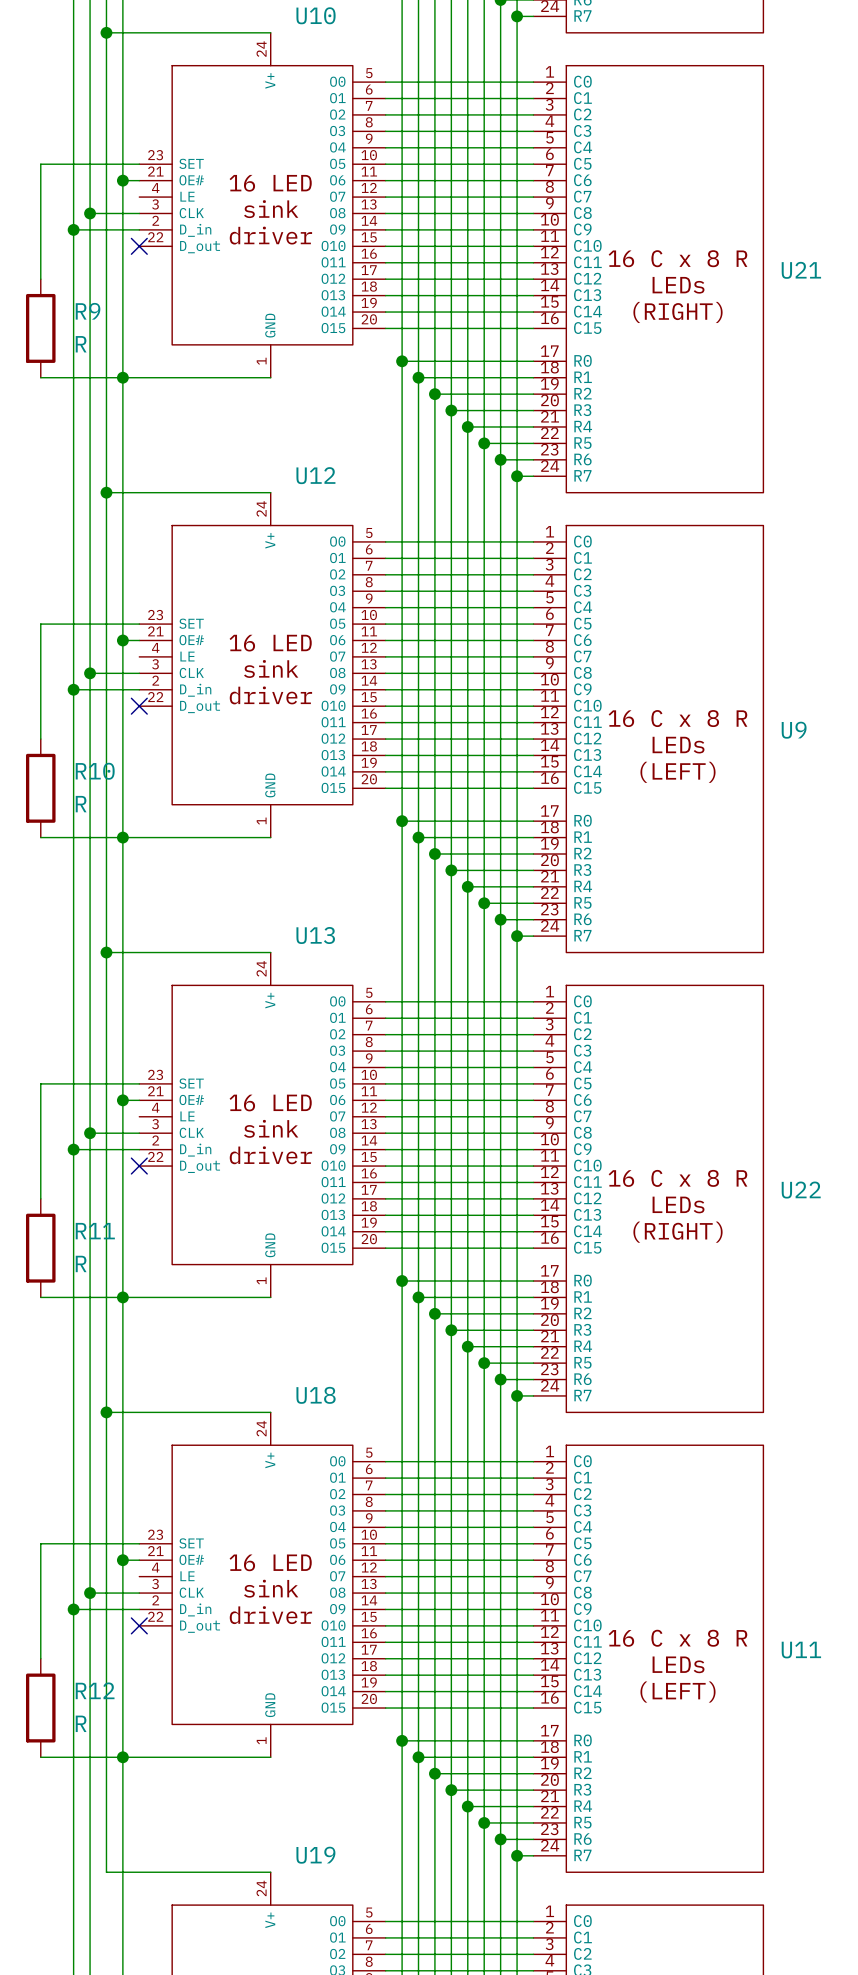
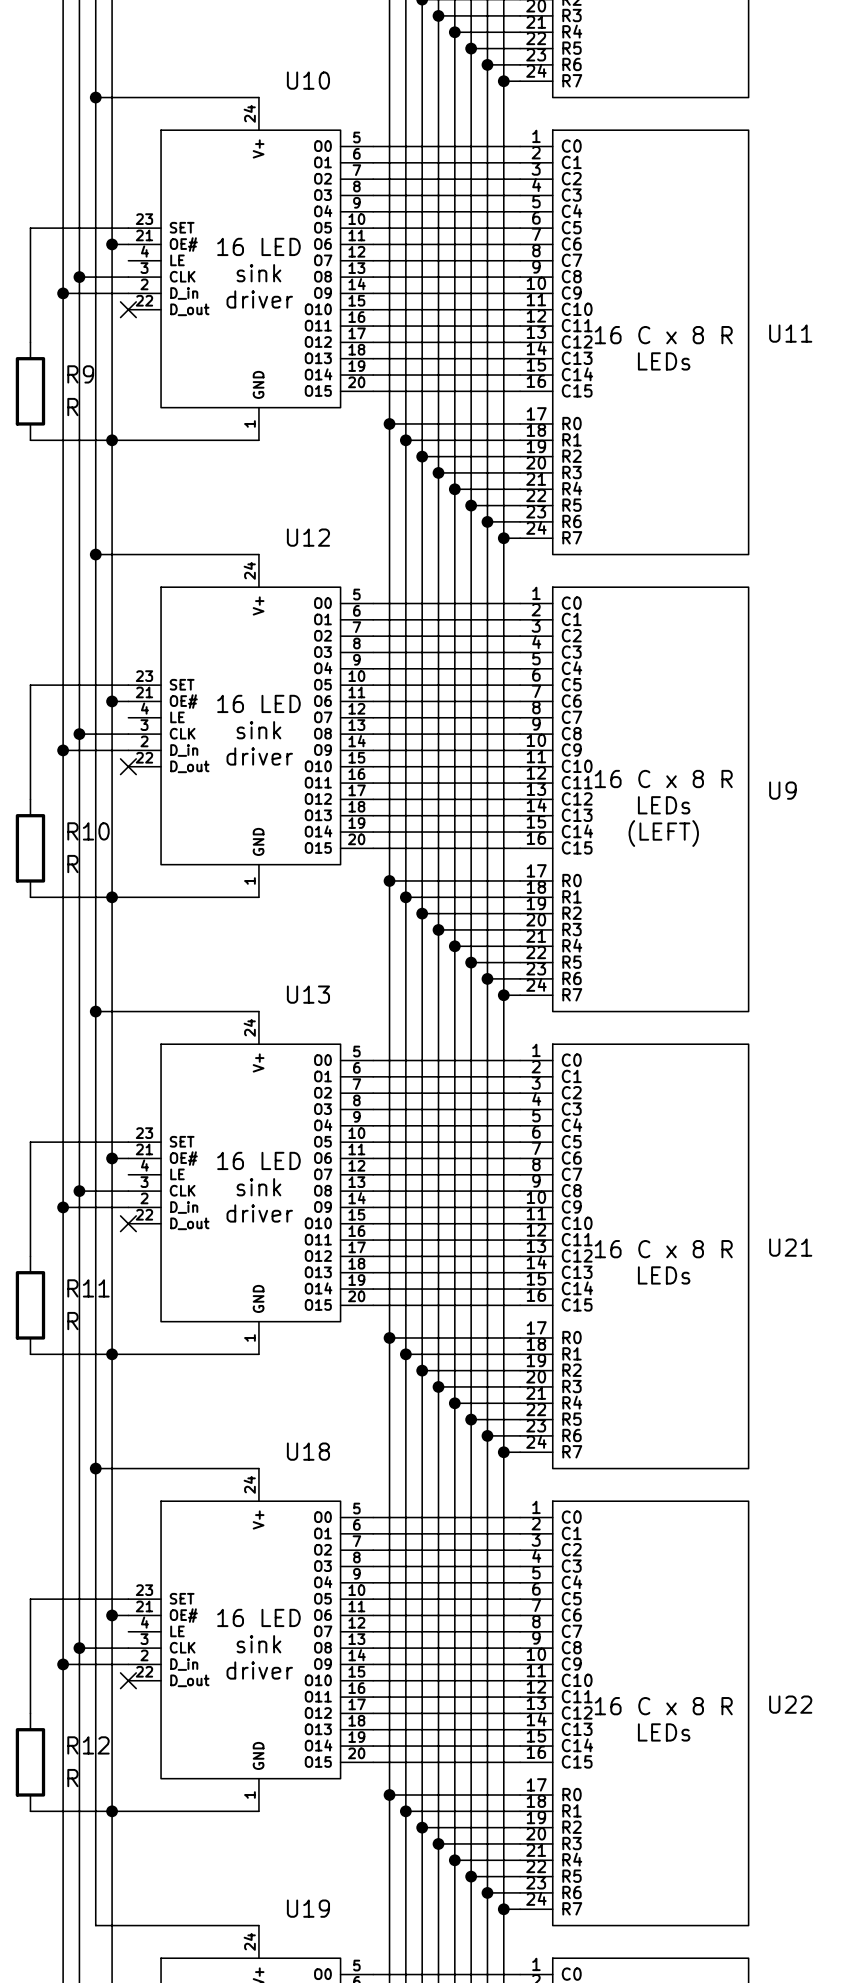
U21 text position: 16 C x 8 R (678, 258) -> 16 C x 8 R (663, 1249)
U21 position: (648, 279) -> (634, 1256)
U21 text position: LEDs (678, 285) -> LEDs (664, 1275)
U21 text: (RIGHT) (678, 312) -> none
U22 text position: 16 C x 8 R (678, 1178) -> 16 C x 8 R (663, 1706)
U22 position: (648, 1198) -> (634, 1713)
U22 text position: LEDs (678, 1204) -> LEDs (664, 1732)
U22 text: (RIGHT) (678, 1232) -> none
U11 text position: 16 C x 8 R (678, 1638) -> 16 C x 8 R (663, 335)
U11 position: (648, 1658) -> (634, 342)
U11 text position: LEDs (678, 1664) -> LEDs (664, 361)
U11 text: (LEFT) (678, 1692) -> none

